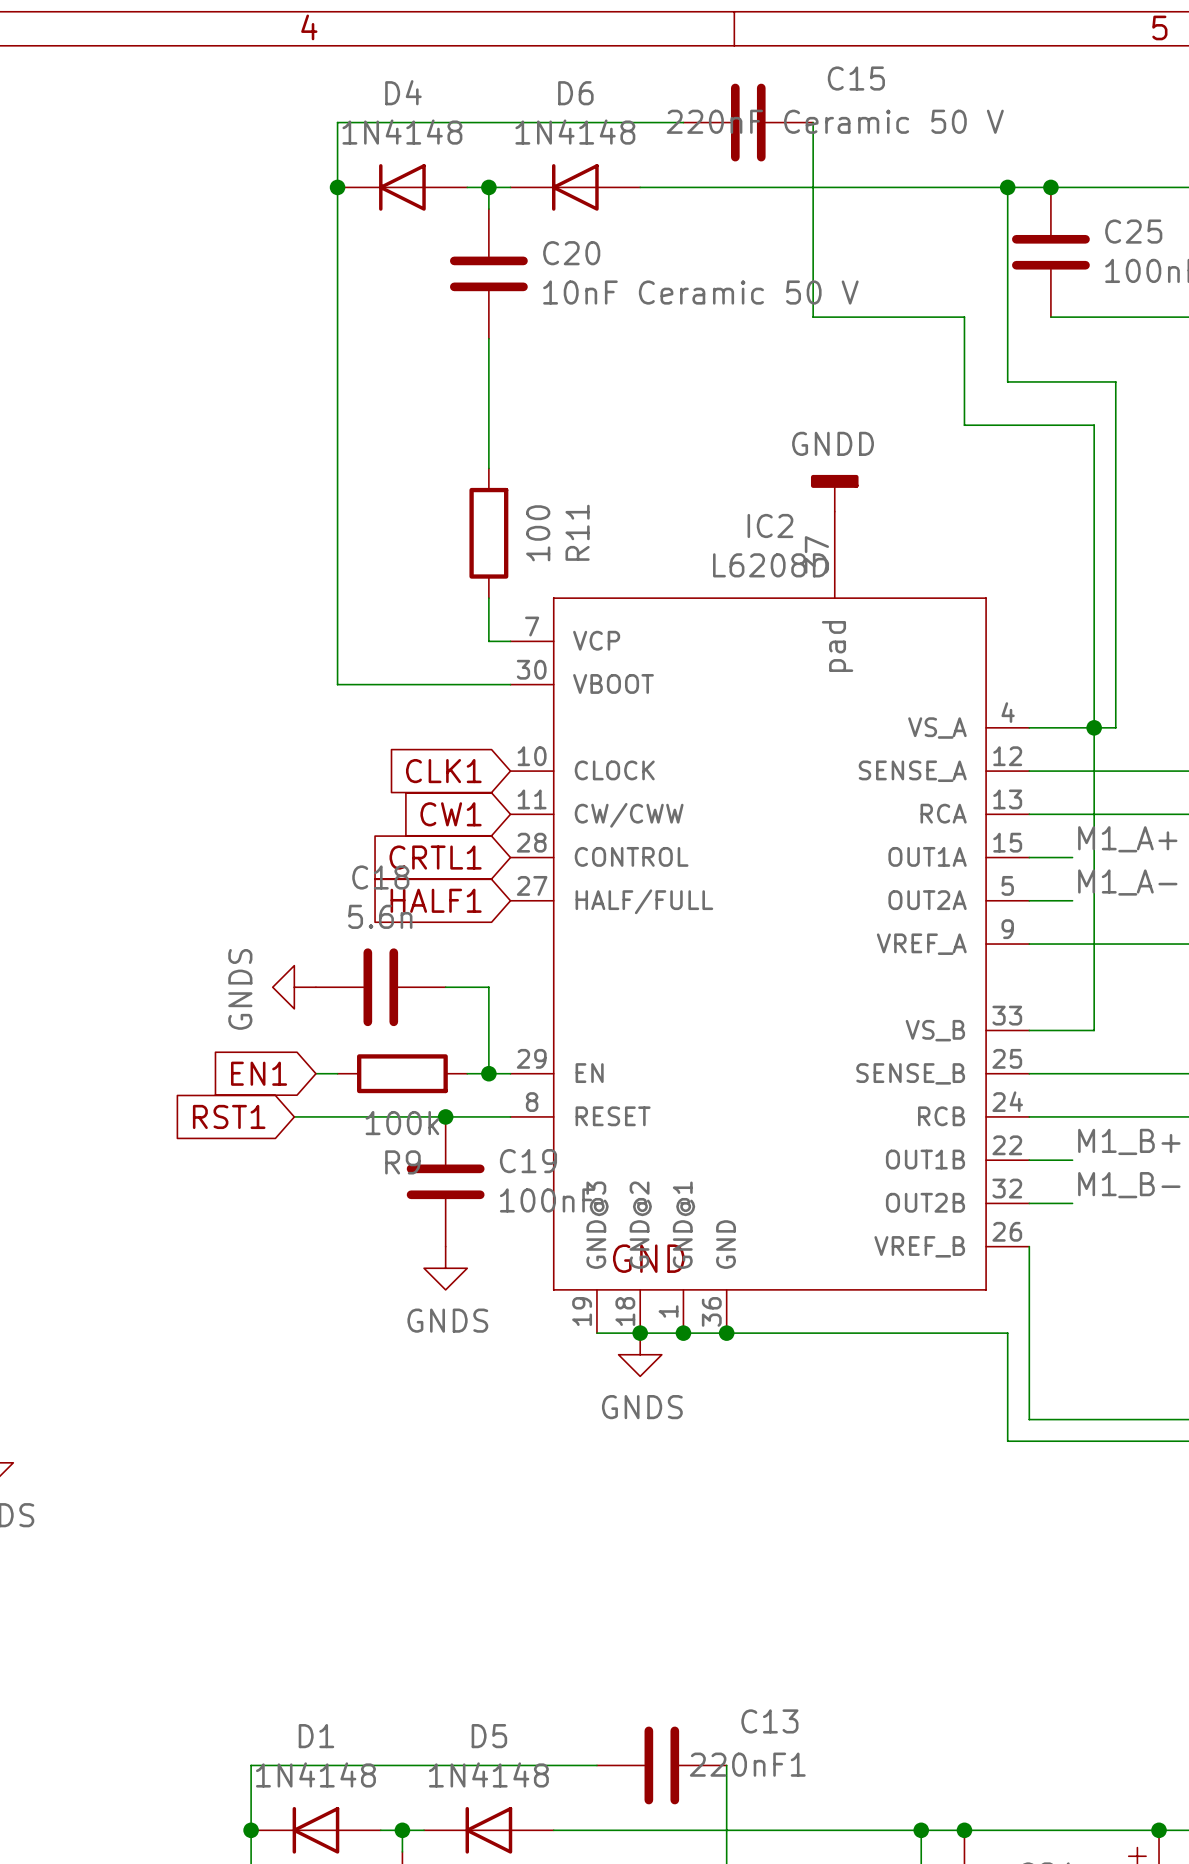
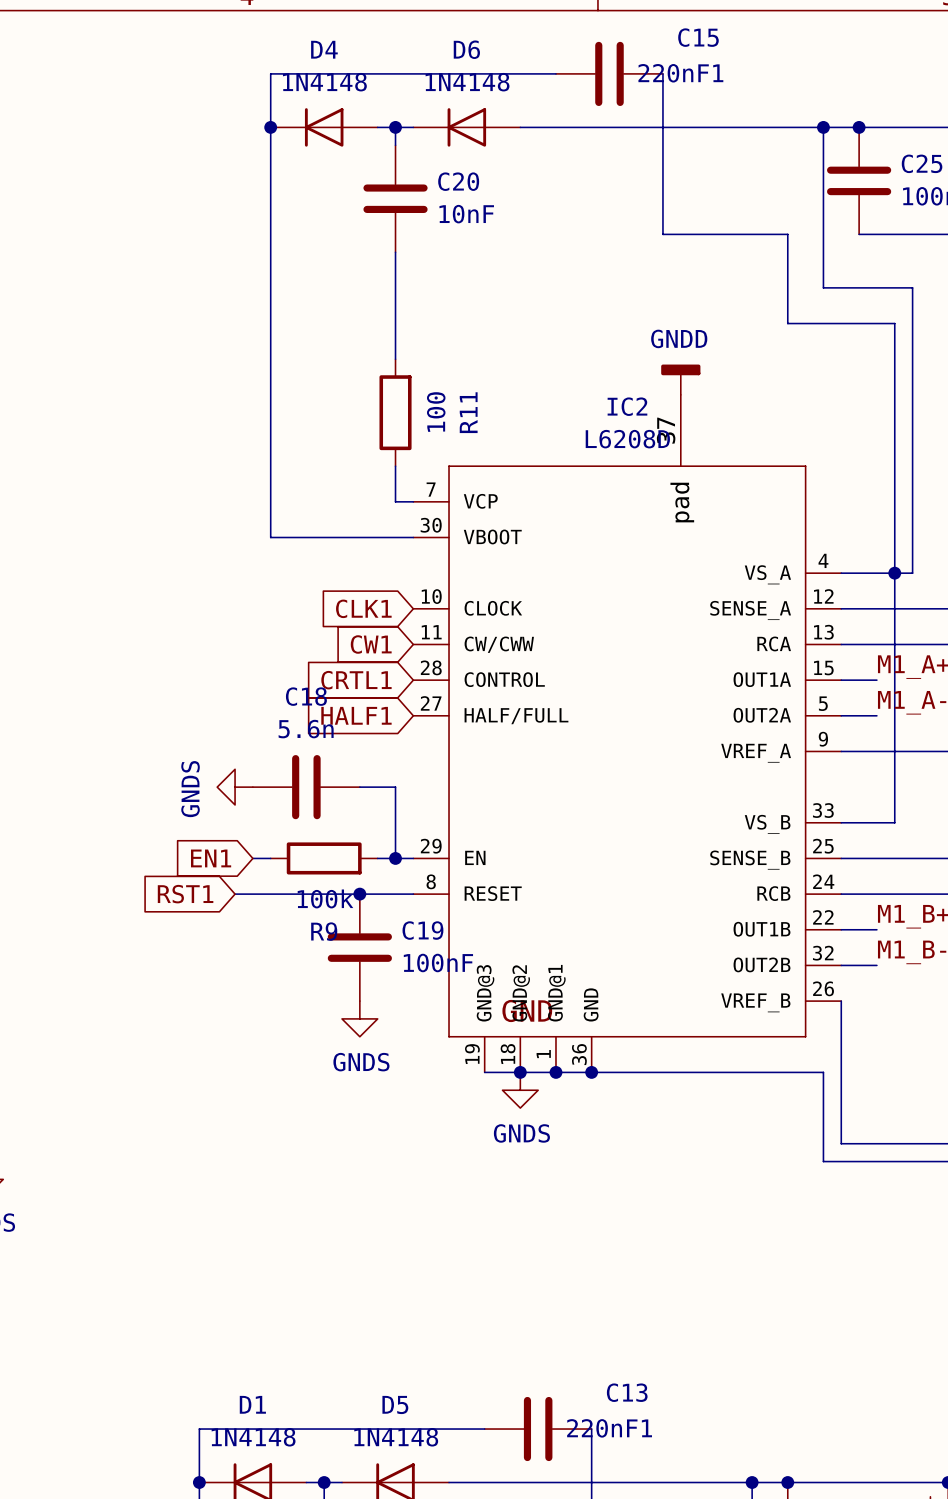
C15 value: 220nF Ceramic 50 V (835, 121) -> 220nF1 (680, 73)
C20 value: 10nF Ceramic 50 V (700, 292) -> 10nF (466, 214)

